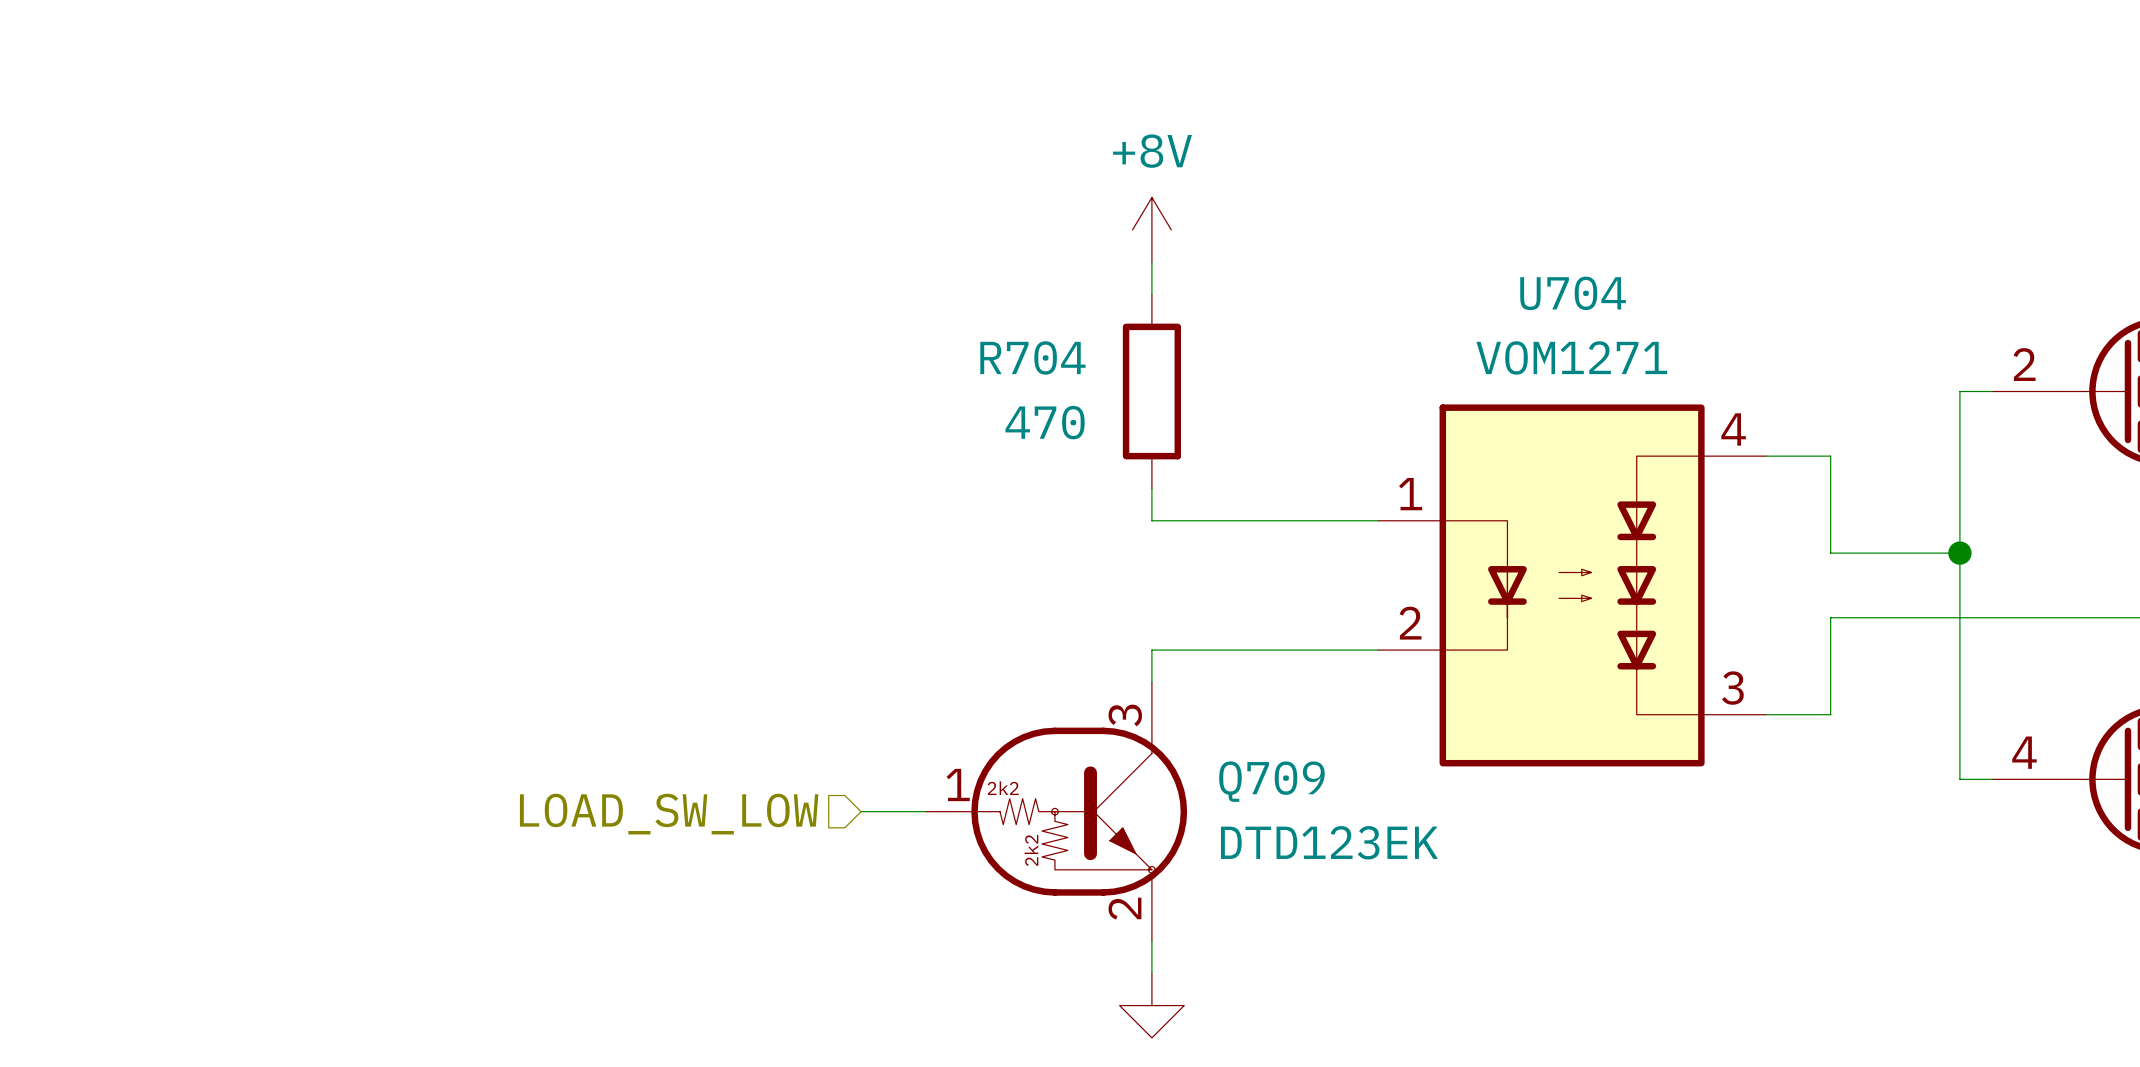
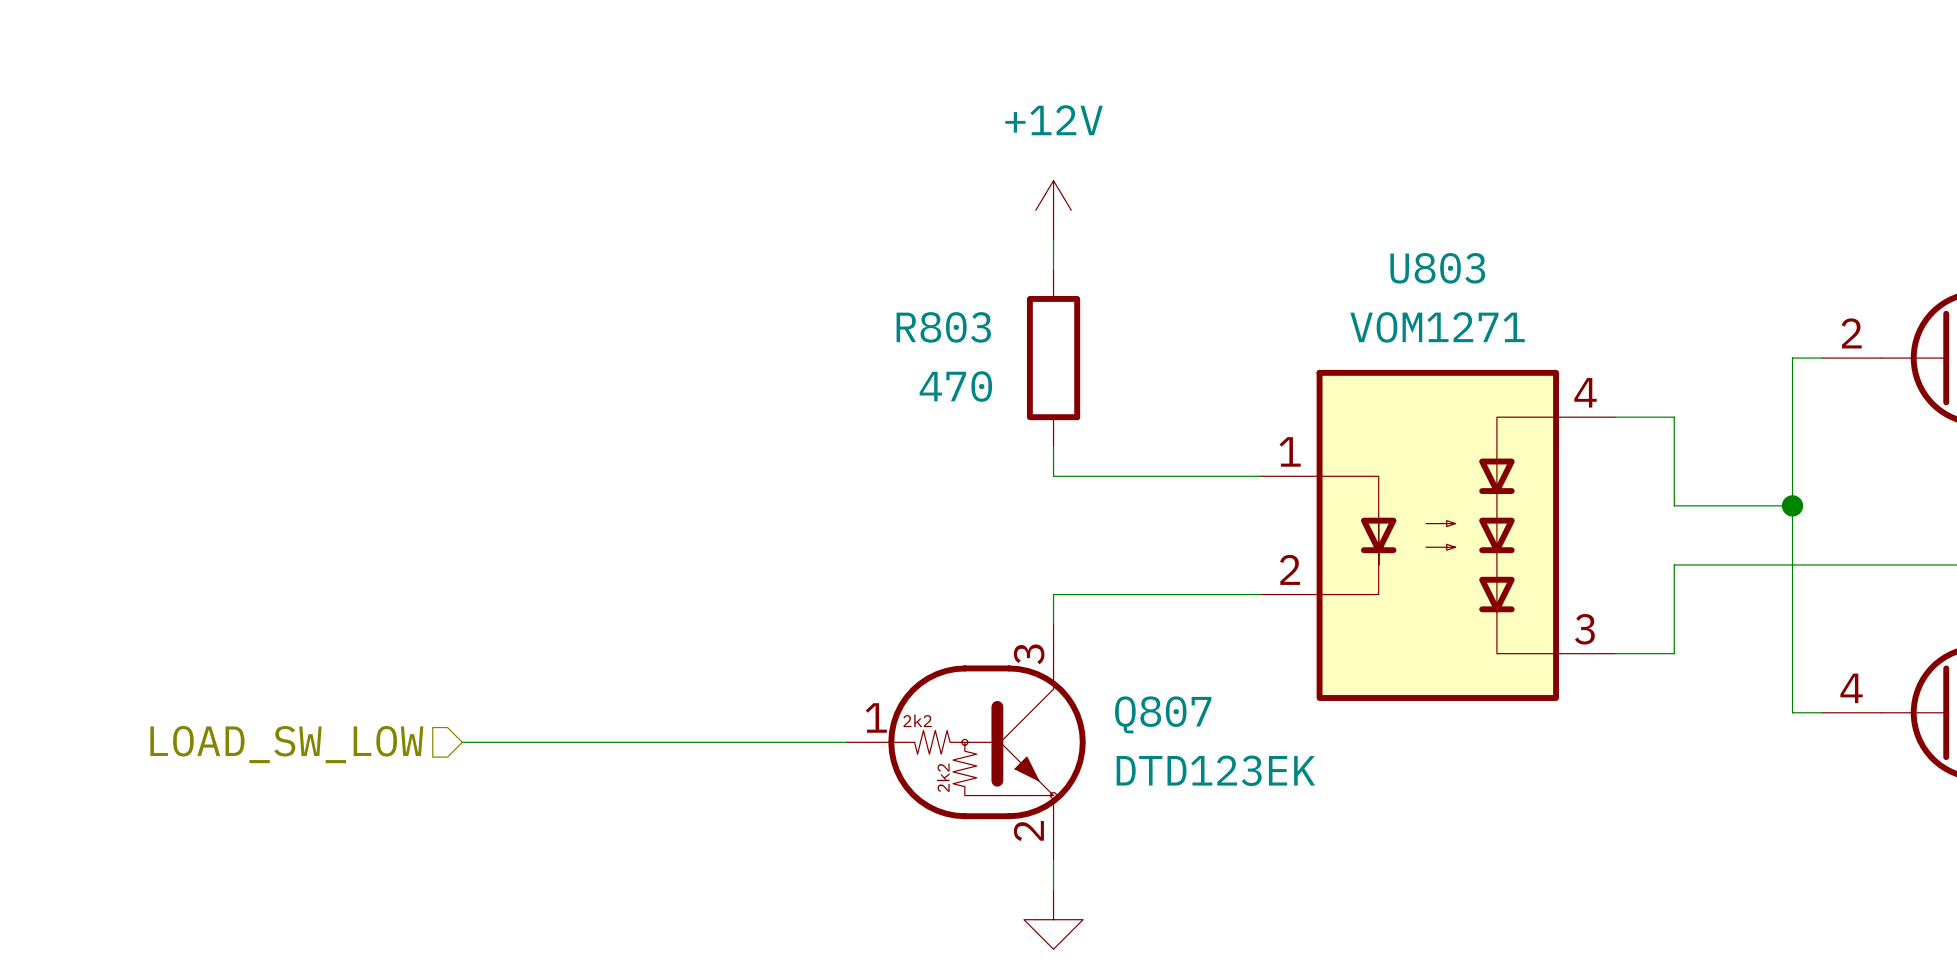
power symbol: +8V (1151, 229) -> +12V (1053, 210)
U704 name: U704 (1573, 293) -> U803 (1437, 268)
R704 name: R704 (1032, 357) -> R803 (943, 327)
Q709 name: Q709 (1271, 781) -> Q807 (1163, 714)
wire: none -> (462, 742) (787, 742)
hierarchical label position: LOAD_SW_LOW (669, 814) -> LOAD_SW_LOW (286, 744)

